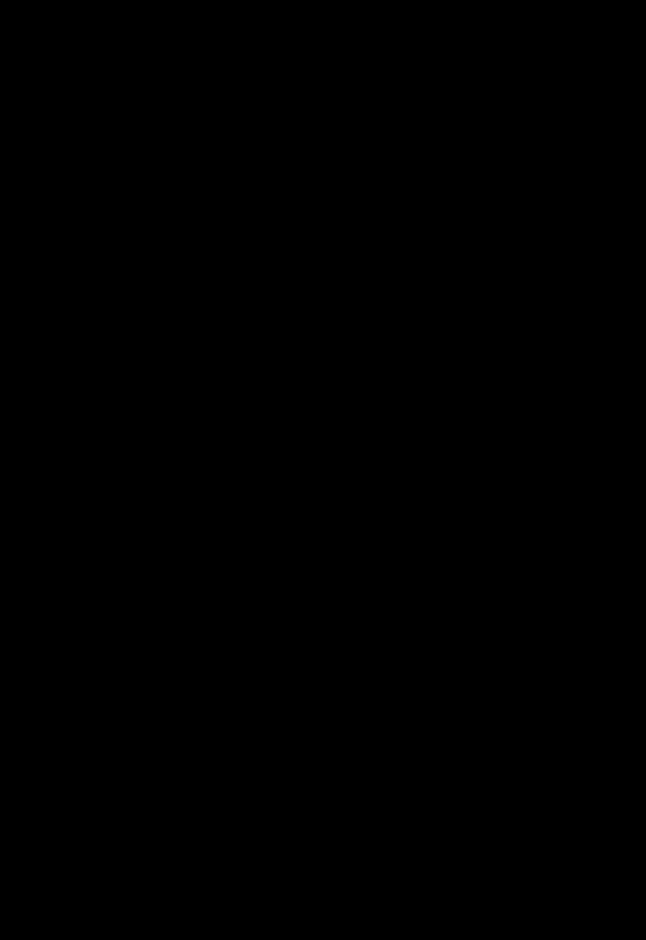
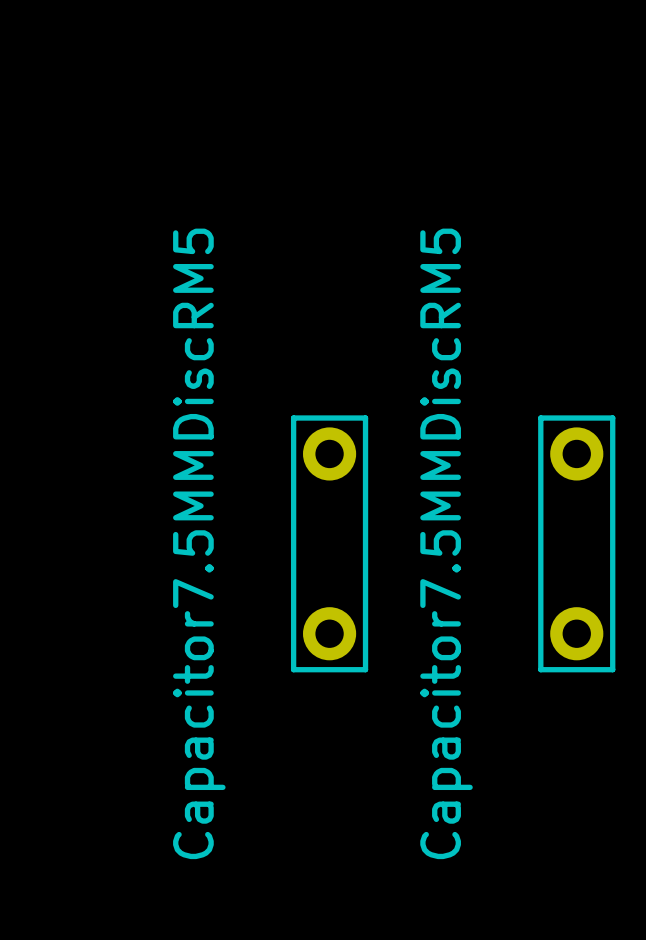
Capacitor7.5MMDiscRM5: none -> (329, 543)
Capacitor7.5MMDiscRM5: none -> (576, 543)

